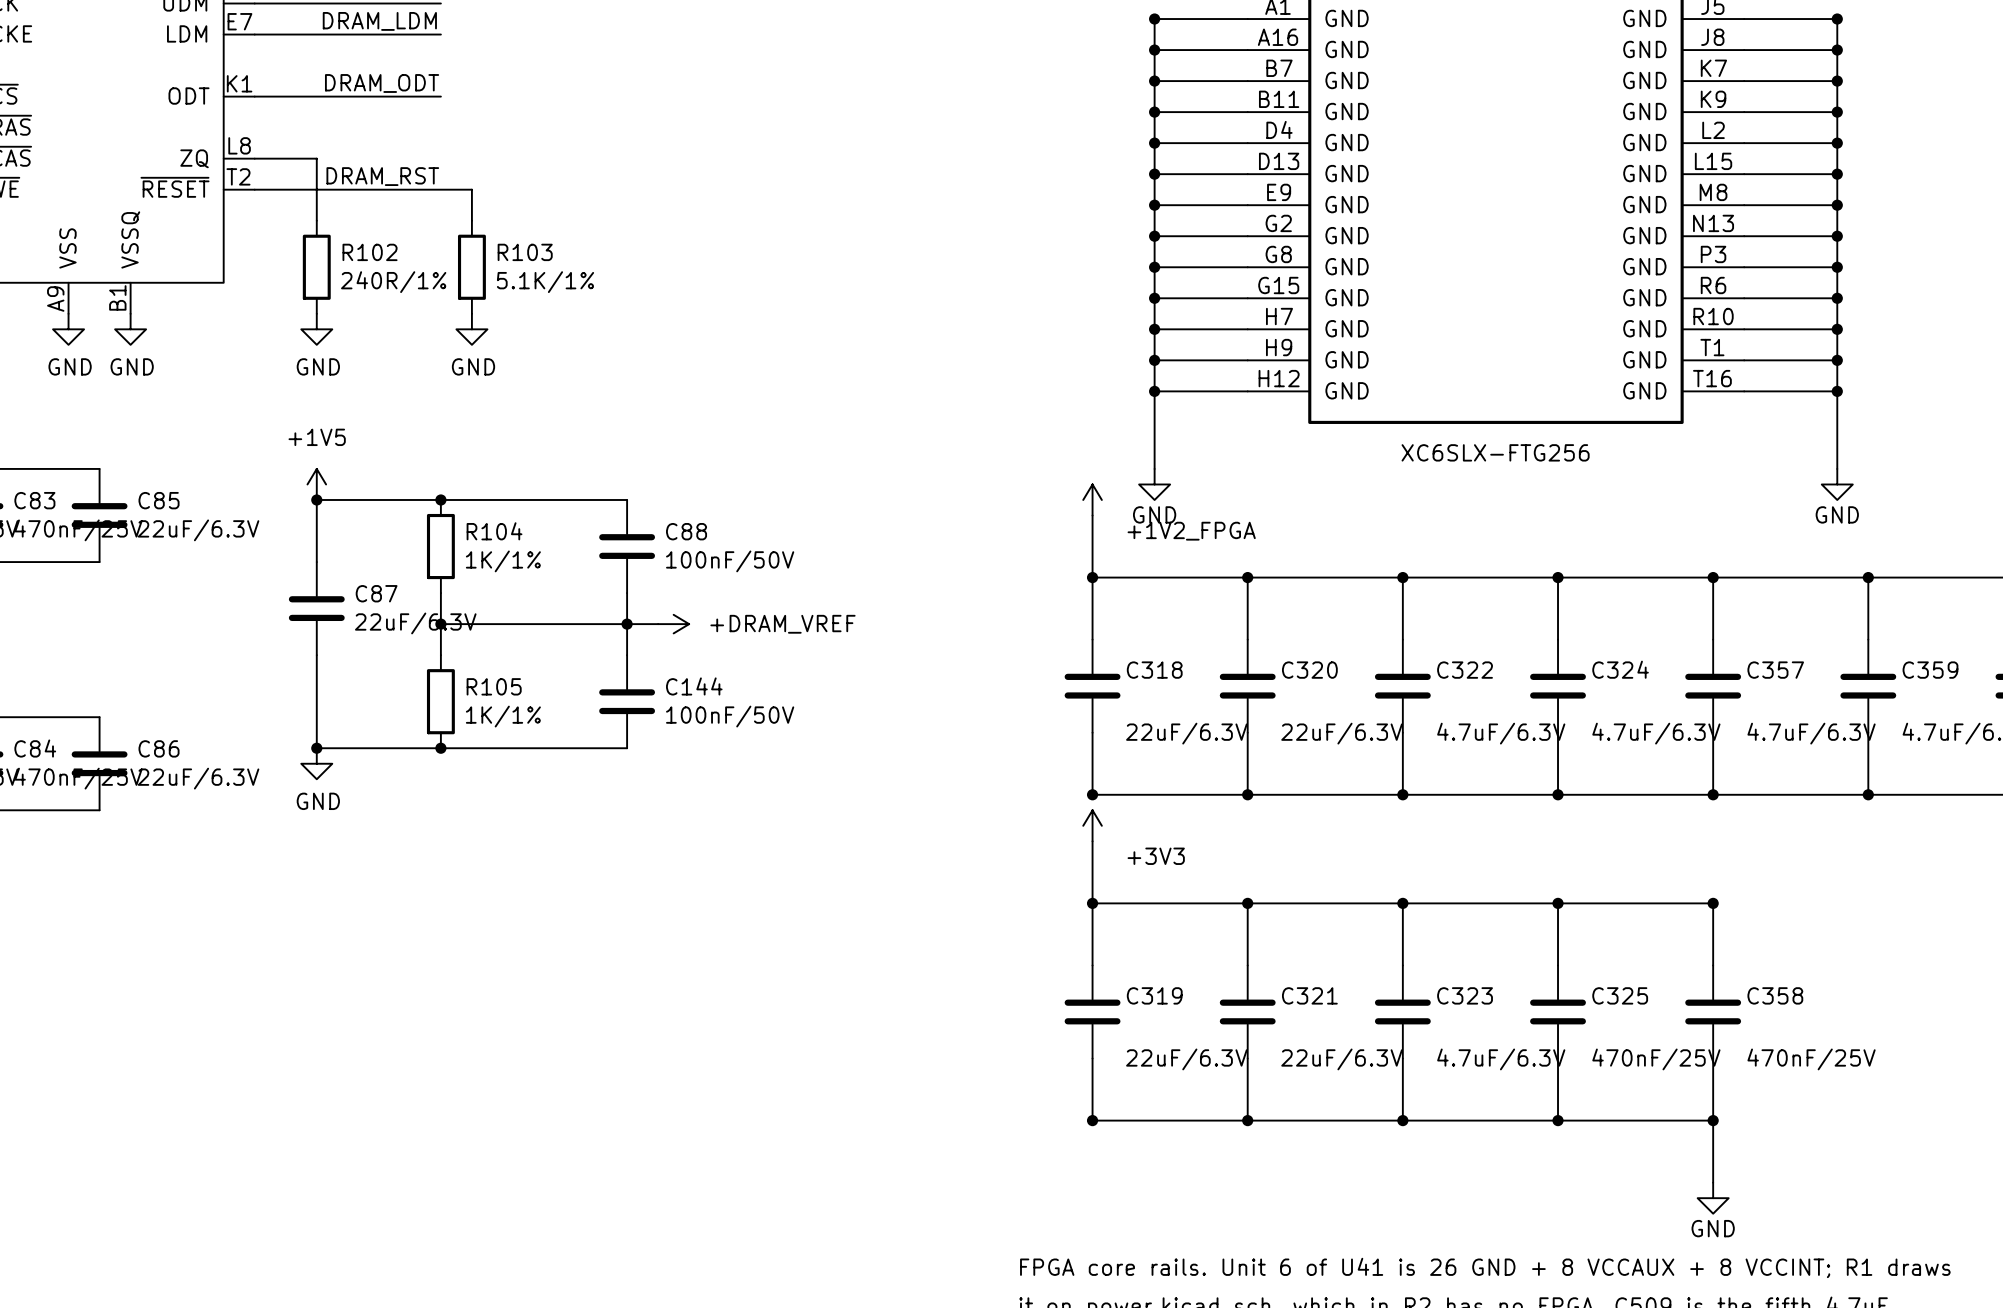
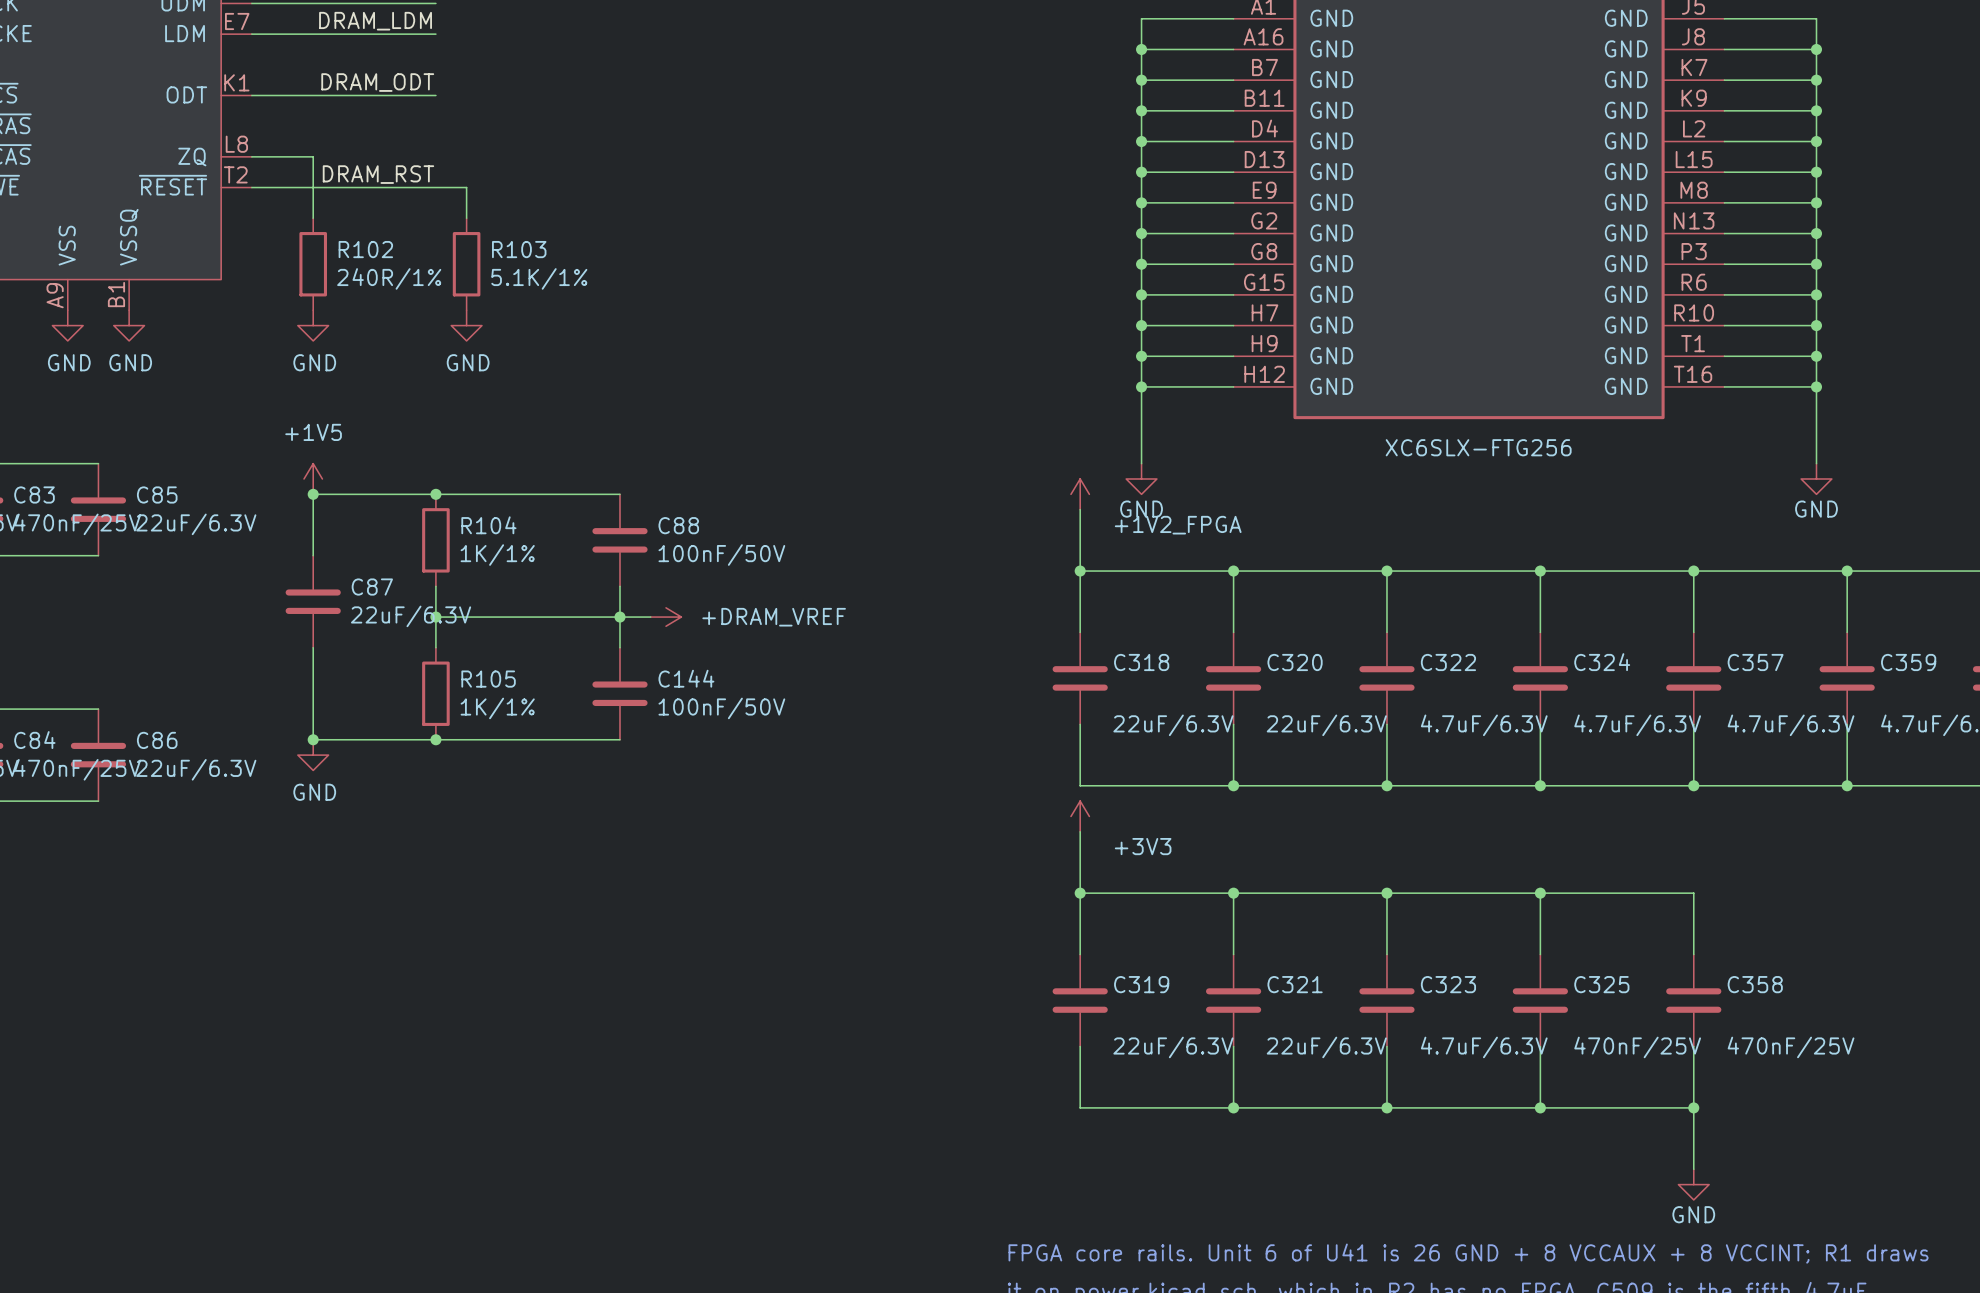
junction: (1154, 19) -> none
junction: (1837, 19) -> none
junction: (1092, 794) -> none
junction: (1713, 903) -> none
junction: (1092, 1120) -> none

